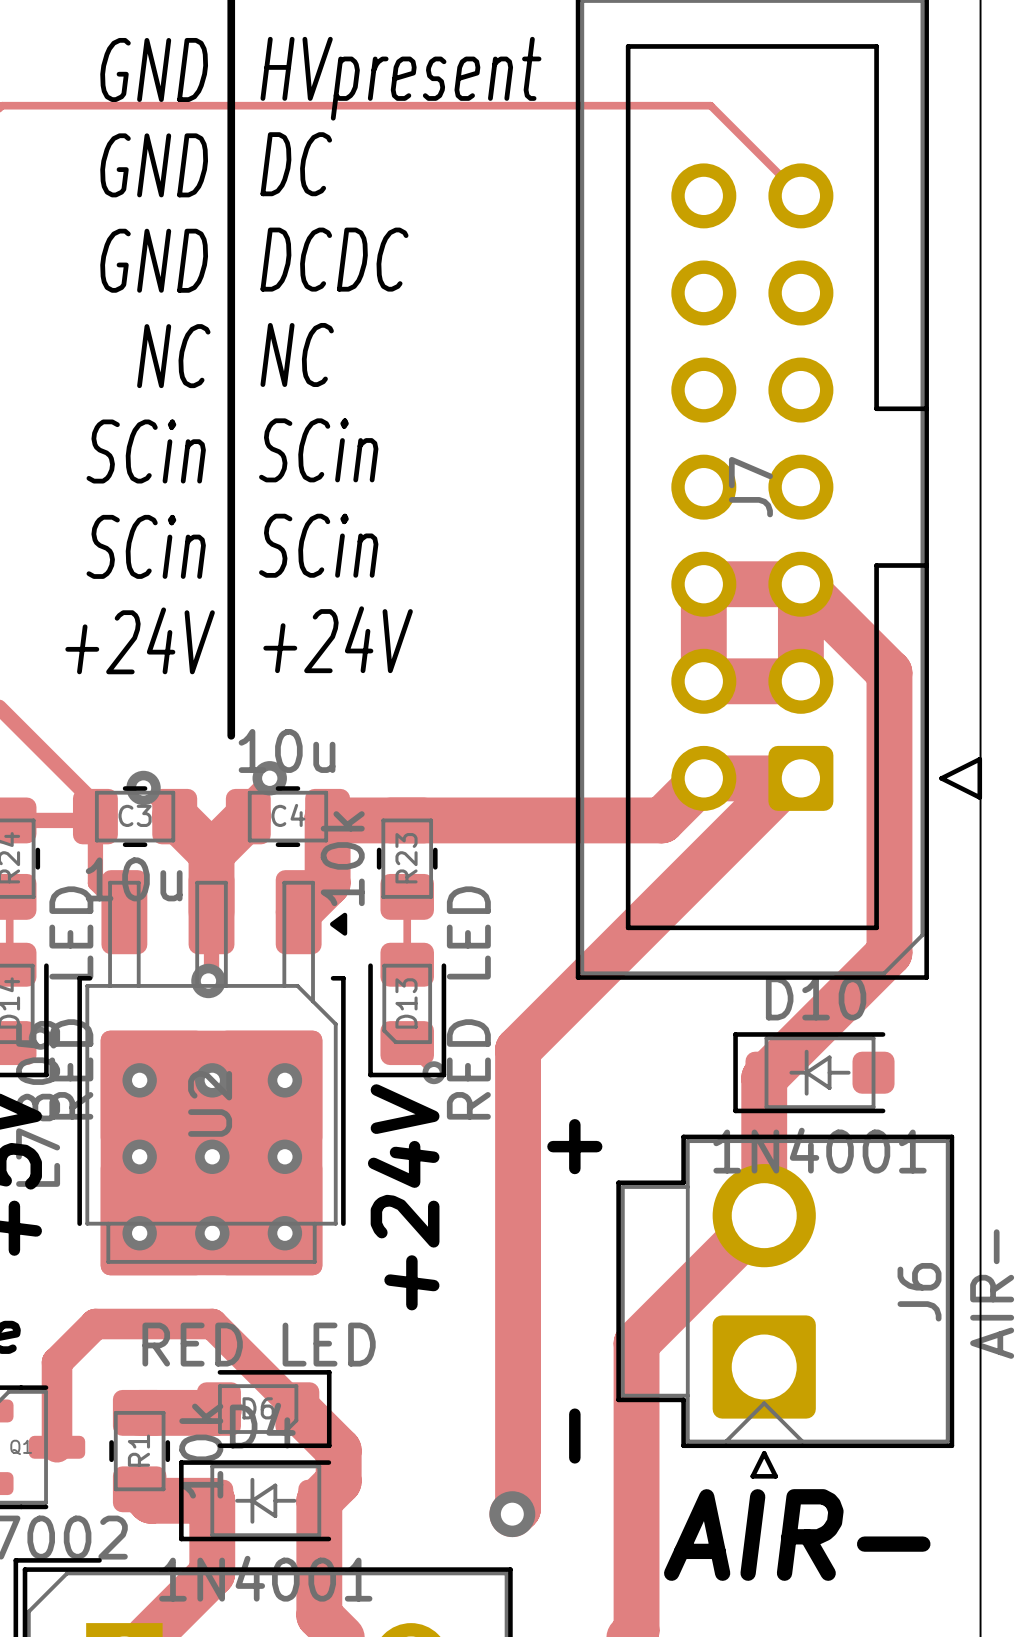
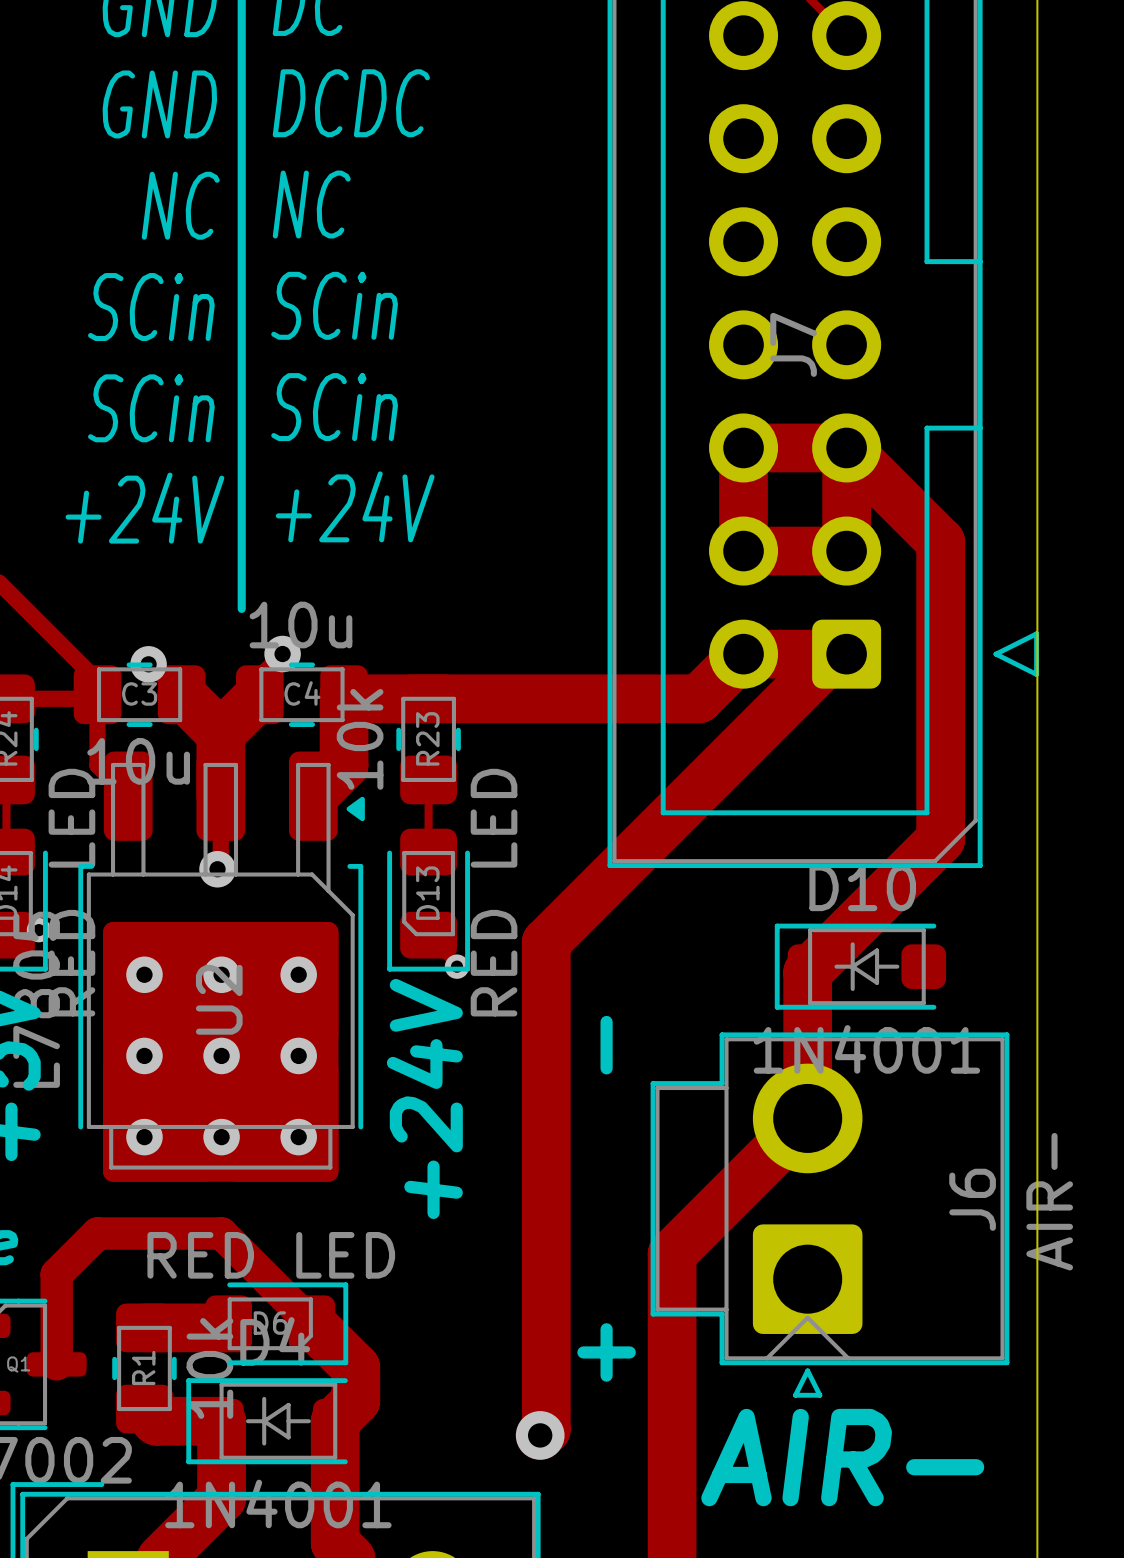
text: - + (574, 1291) -> + - (606, 1198)

